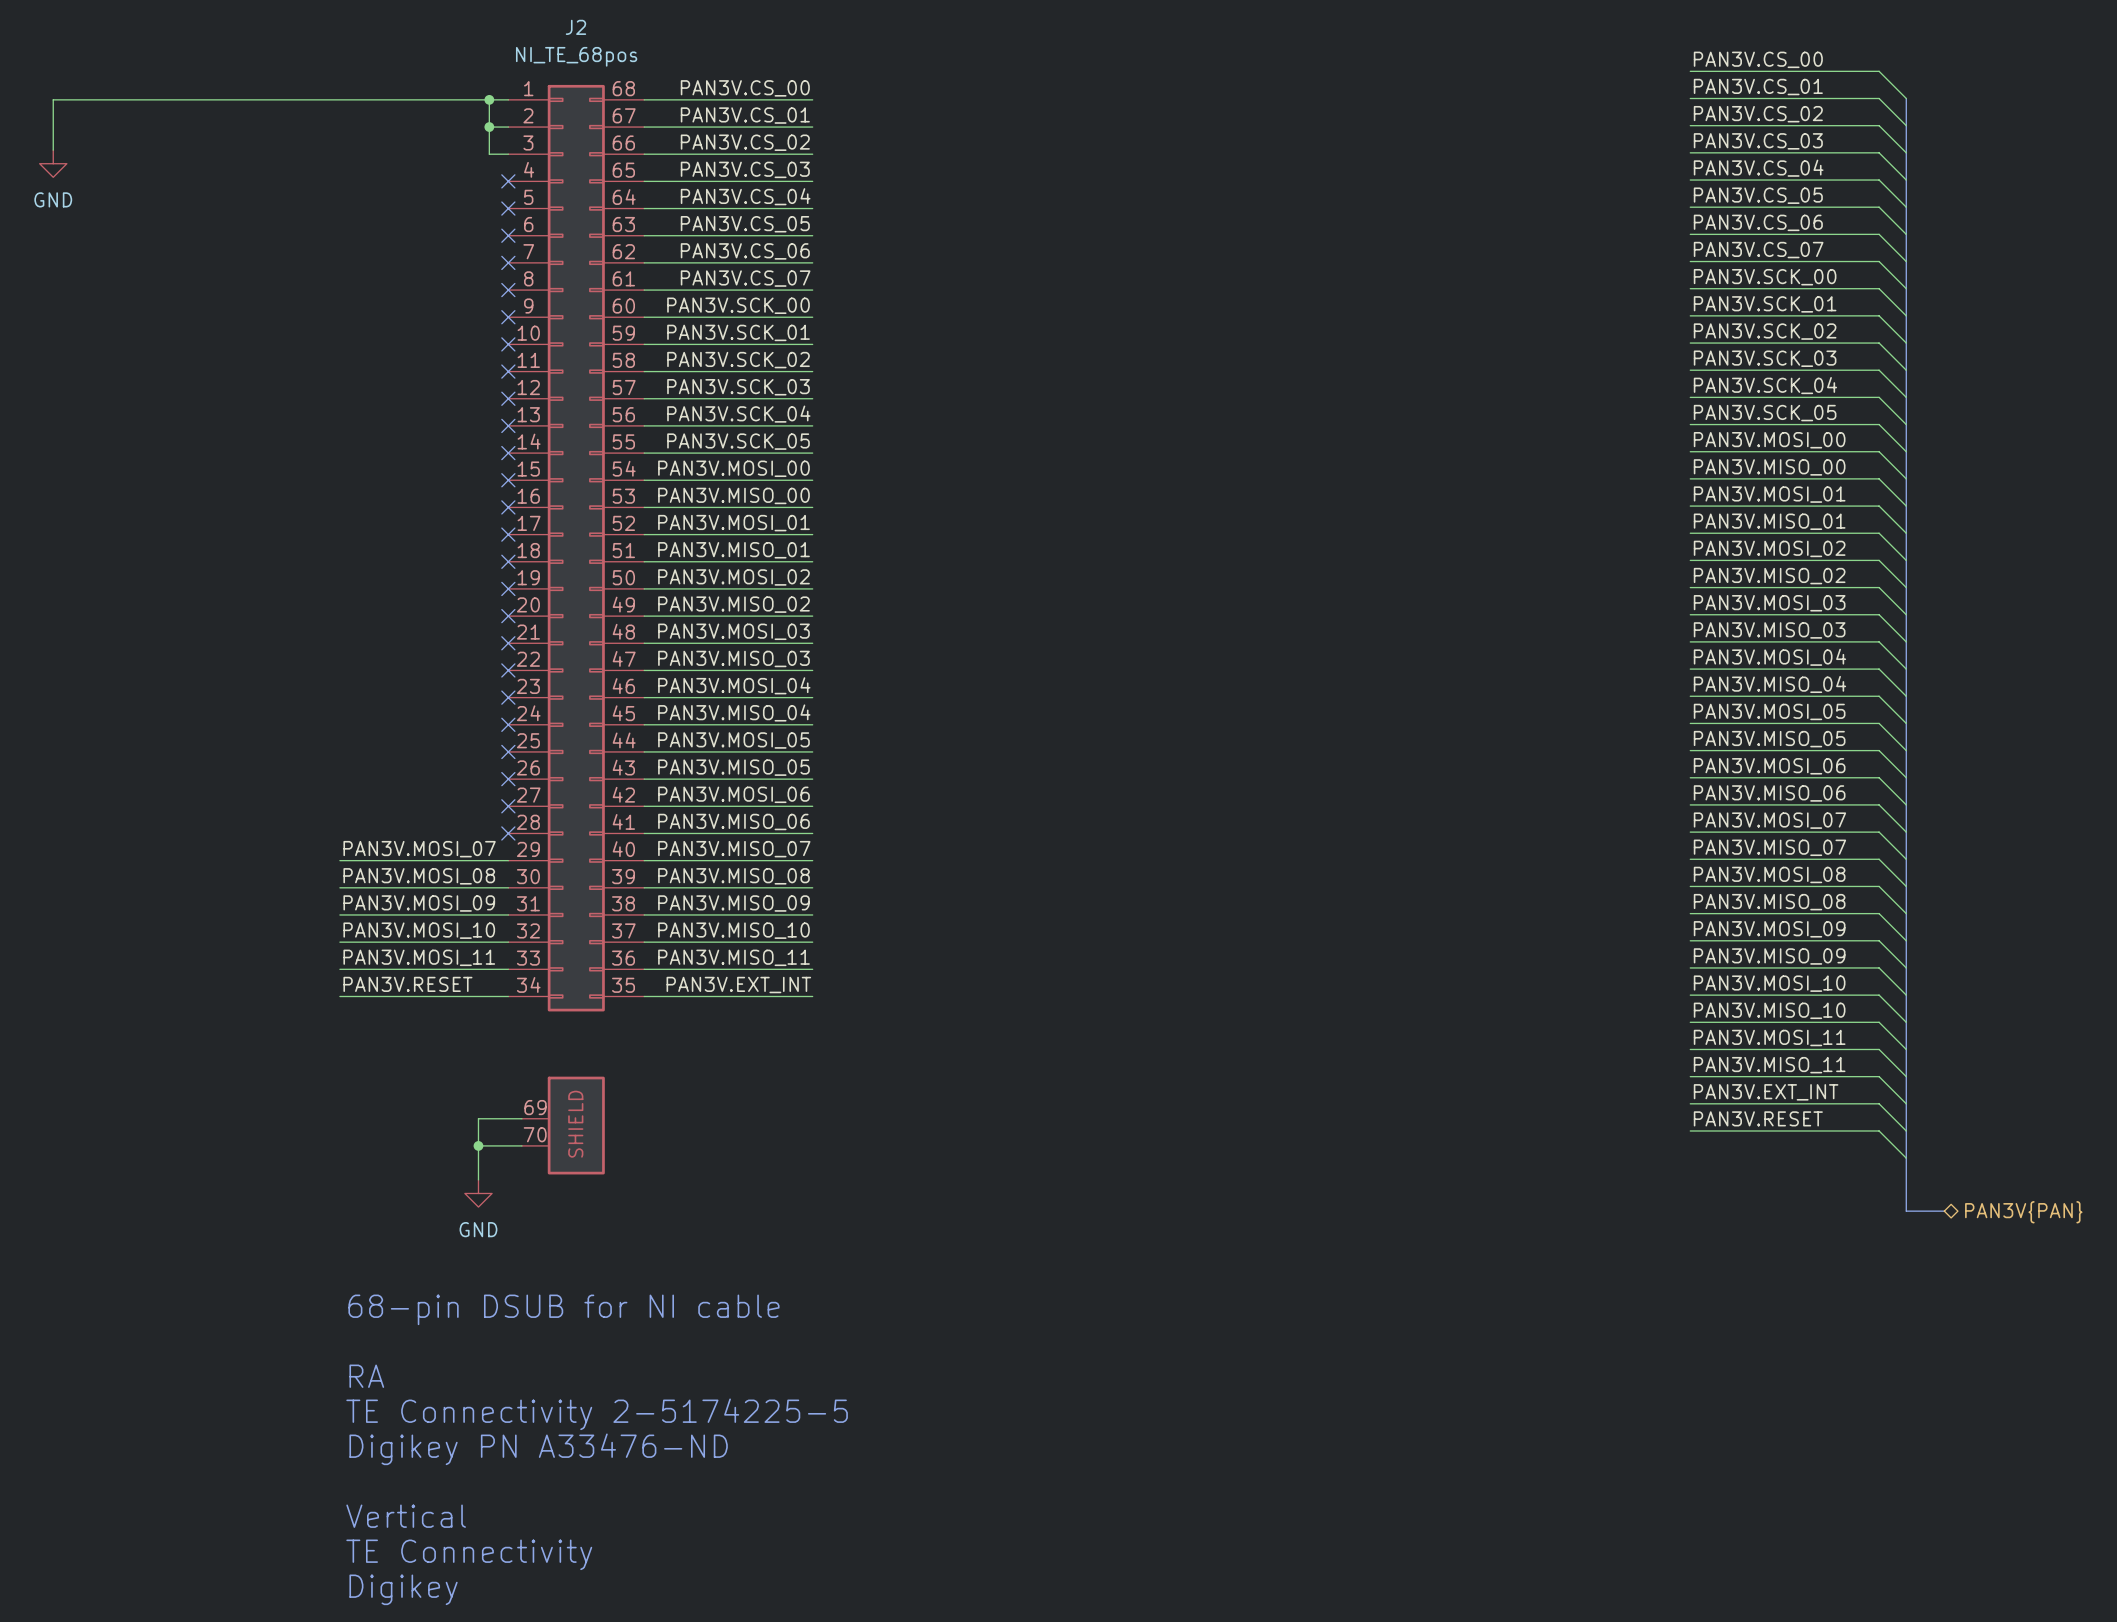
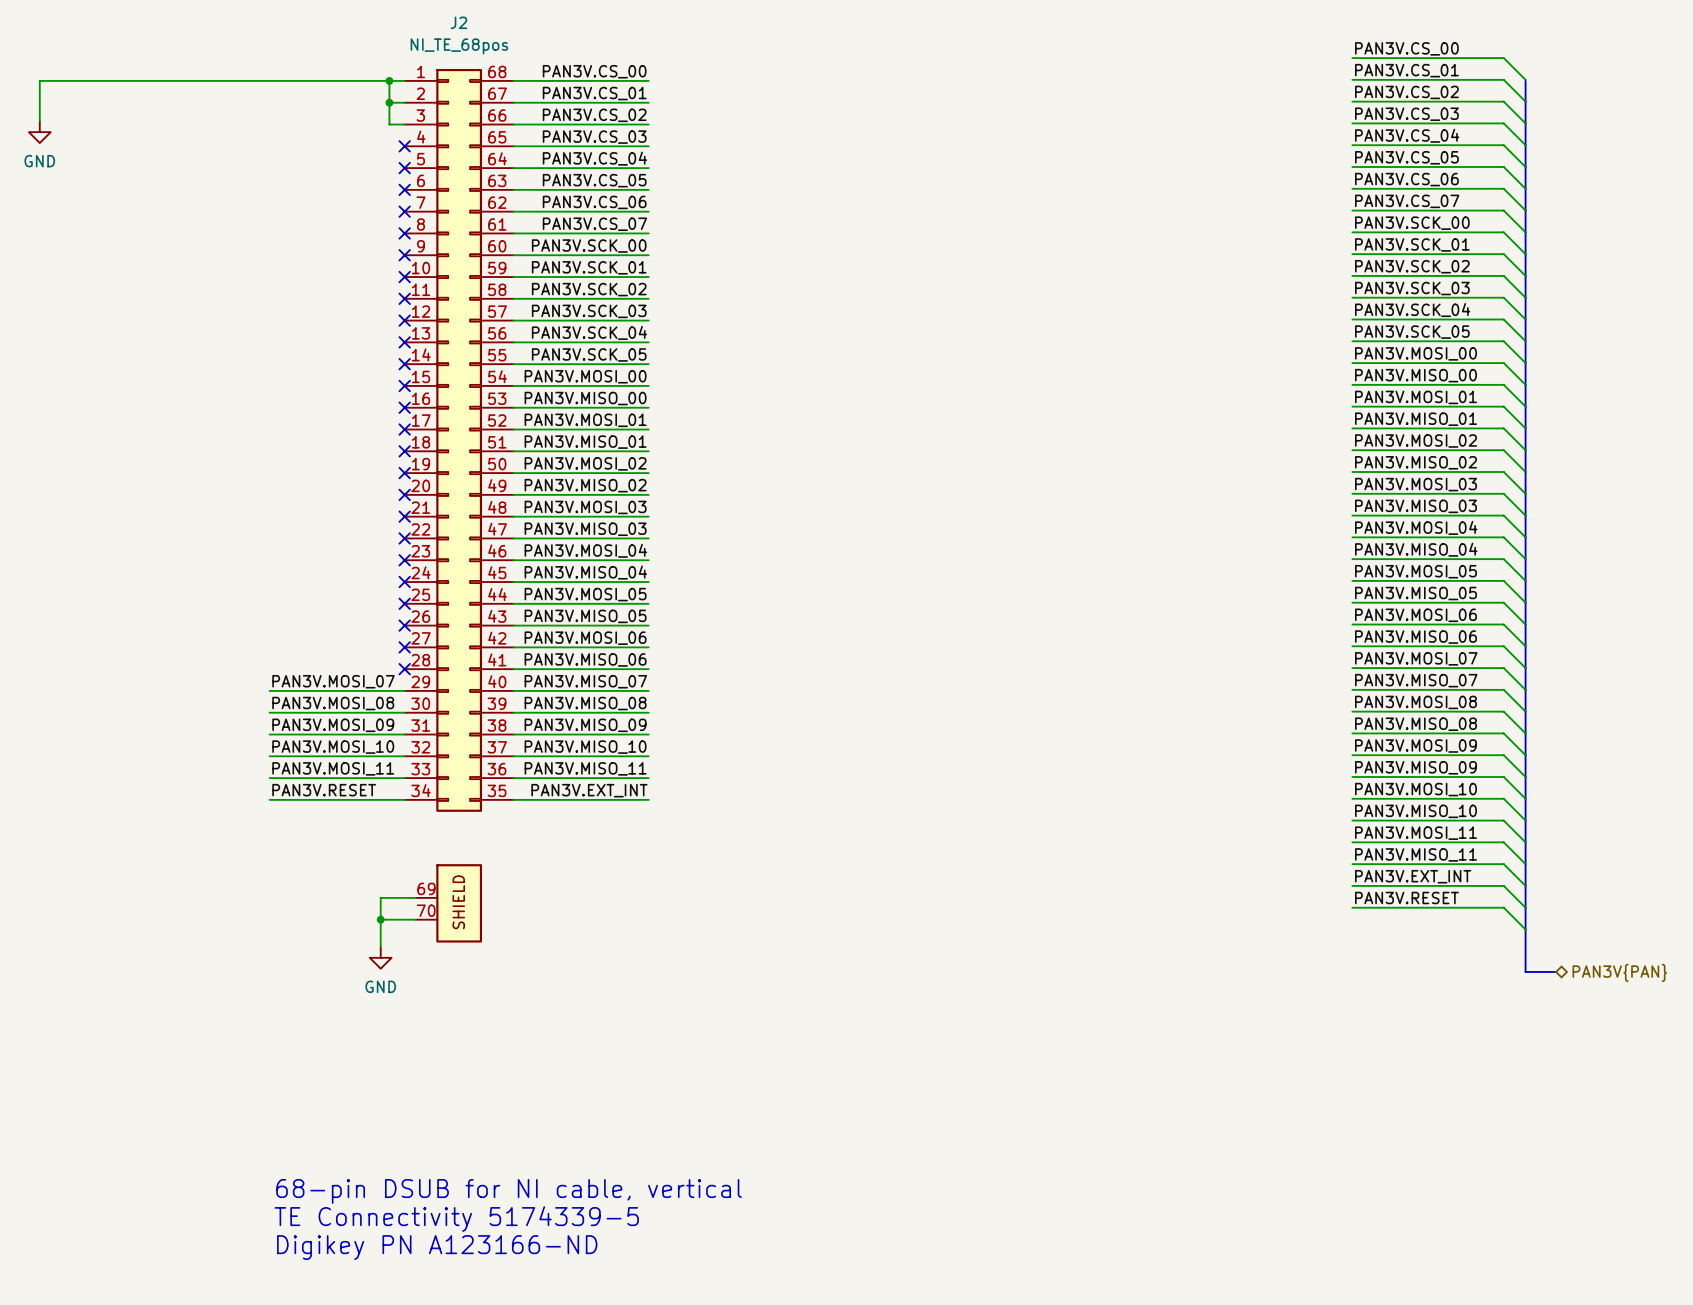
text: 68-pin DSUB for NI cable (563, 1309) -> none
text: RA (366, 1376) -> none
text: TE Connectivity 2-5174225-5 (597, 1414) -> none
text: Digikey PN A33476-ND (538, 1449) -> none
text: none -> 68-pin DSUB for NI cable, vertical (509, 1191)
text: Vertical (406, 1516) -> TE Connectivity 5174339-5 (456, 1219)
text: TE Connectivity (469, 1554) -> Digikey PN A123166-ND (437, 1247)
text: Digikey (403, 1589) -> none

